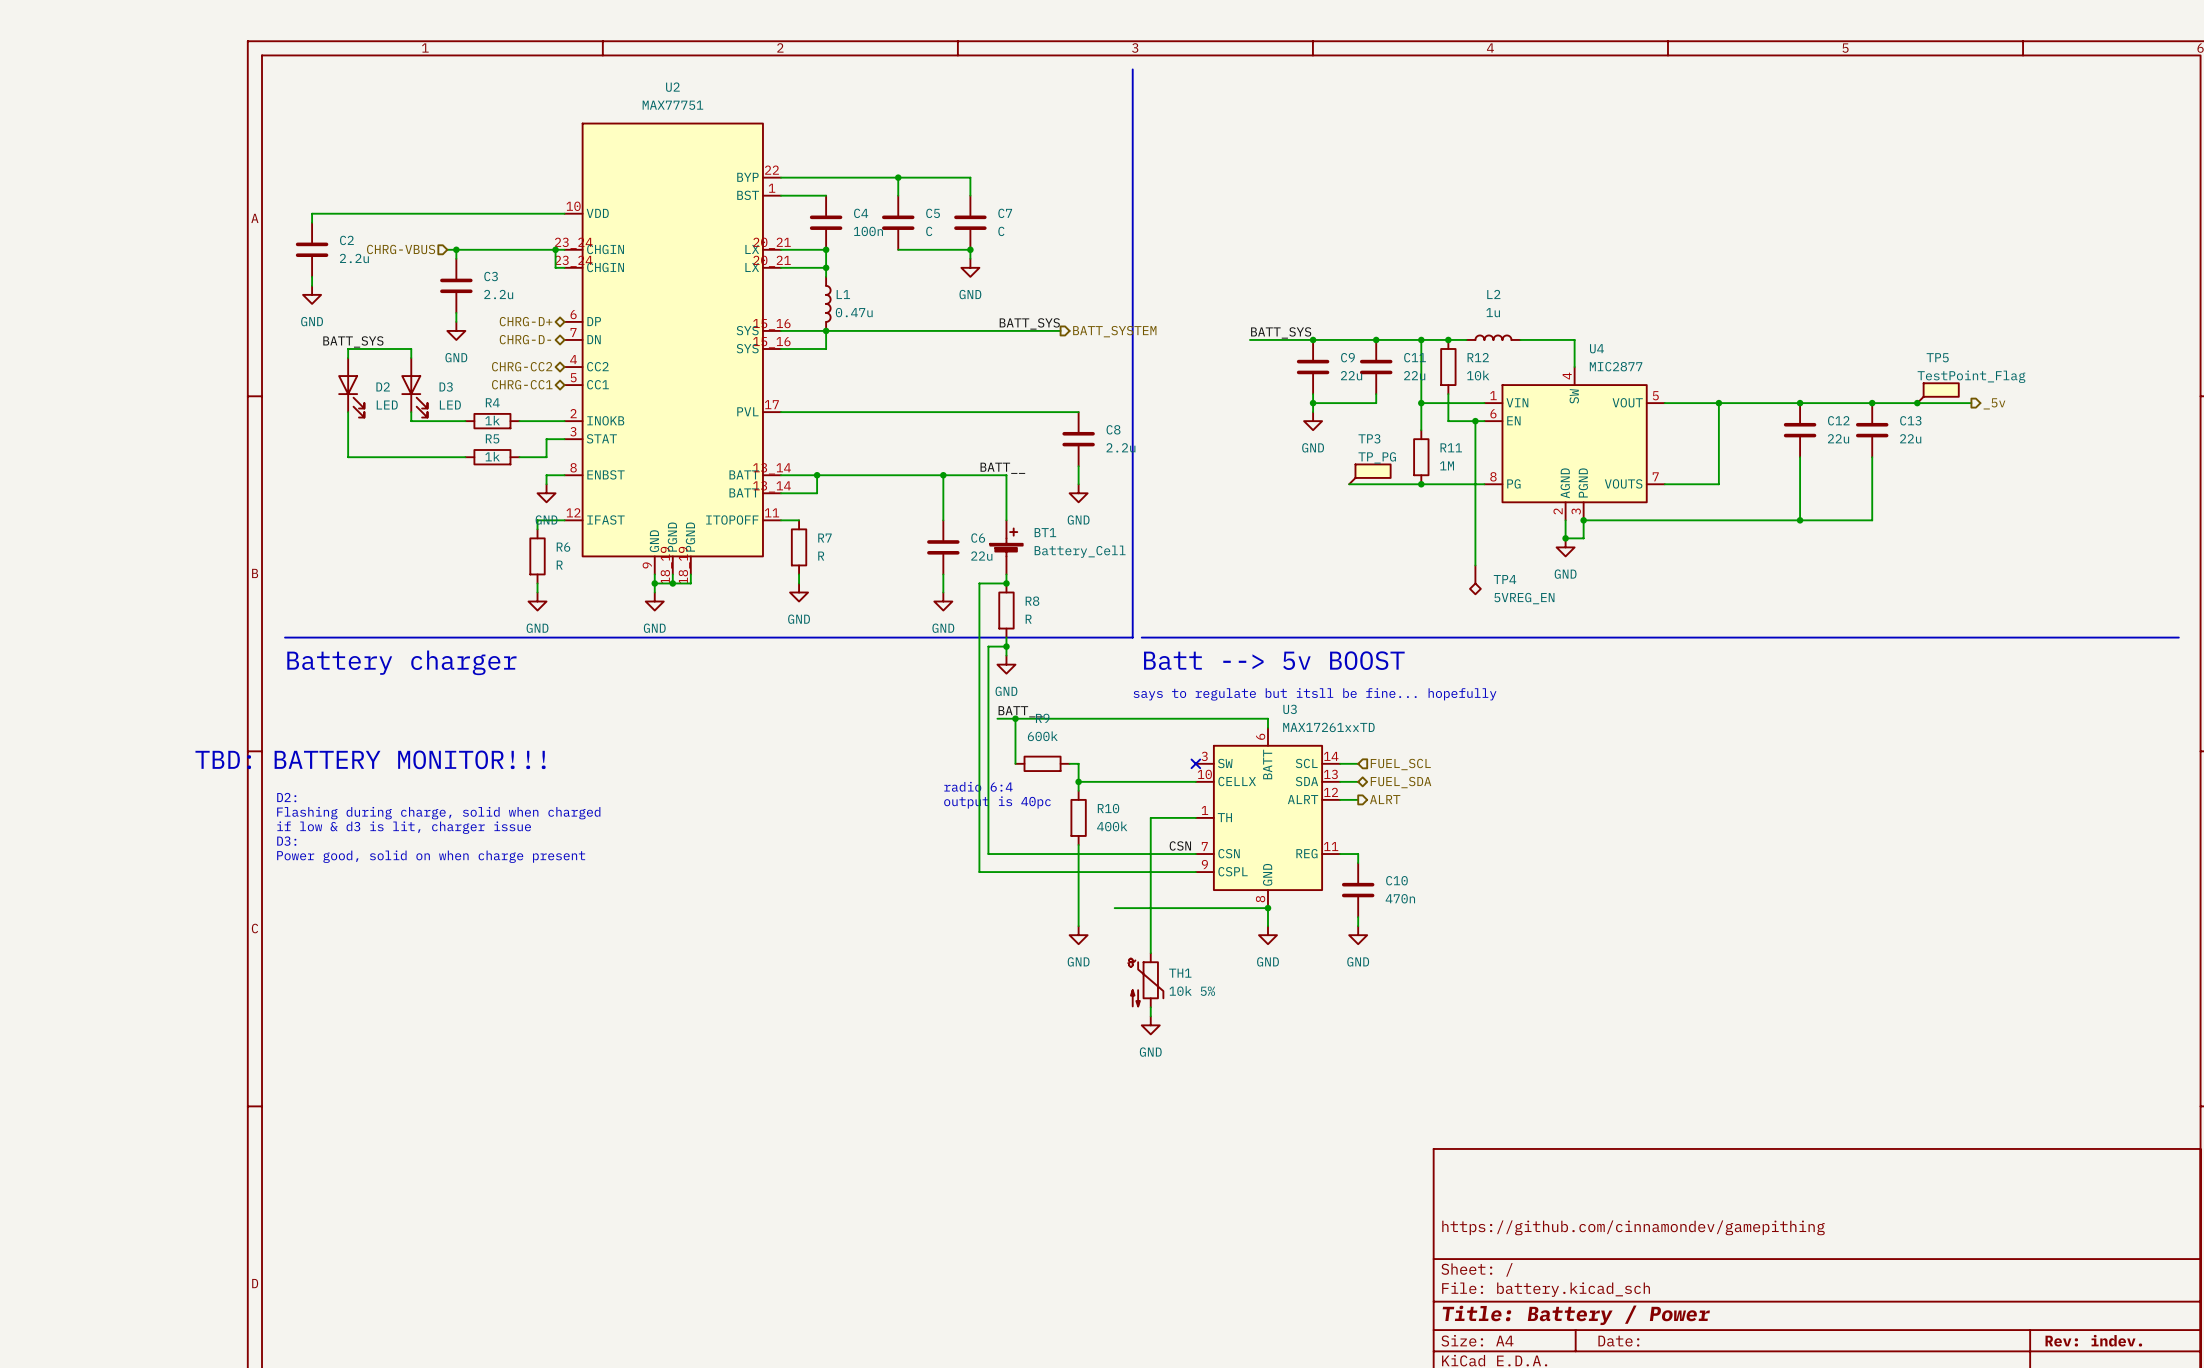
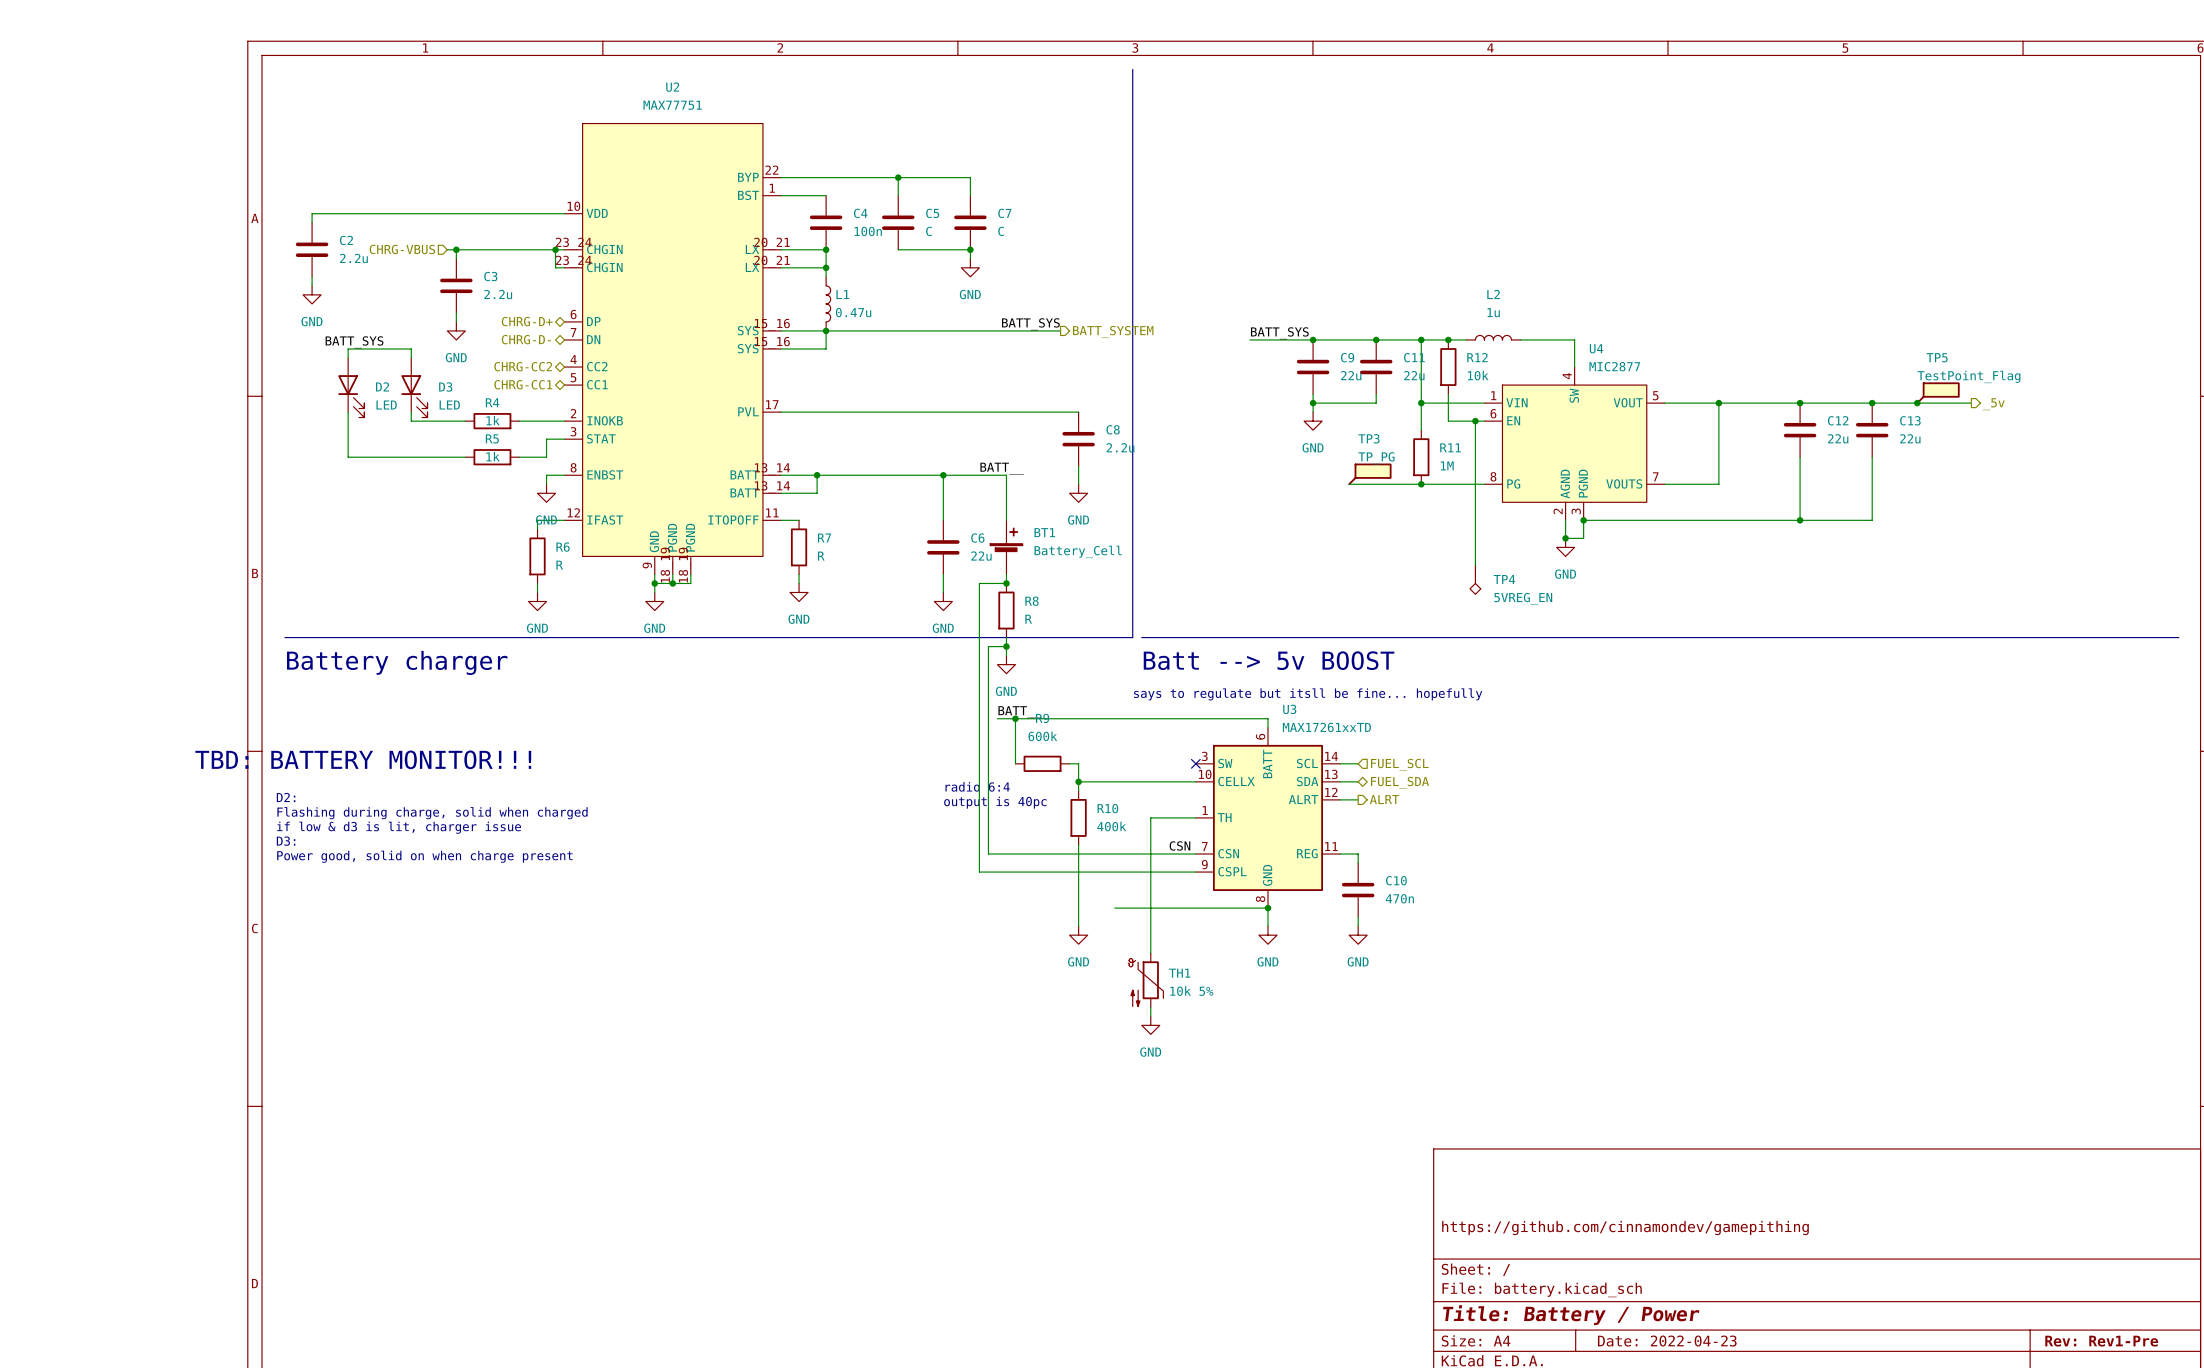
title block: Rev: indev. (2093, 1340) -> Rev: Rev1-Pre (2101, 1341)
title block: Date: (1618, 1341) -> Date: 2022-04-23 (1667, 1341)

